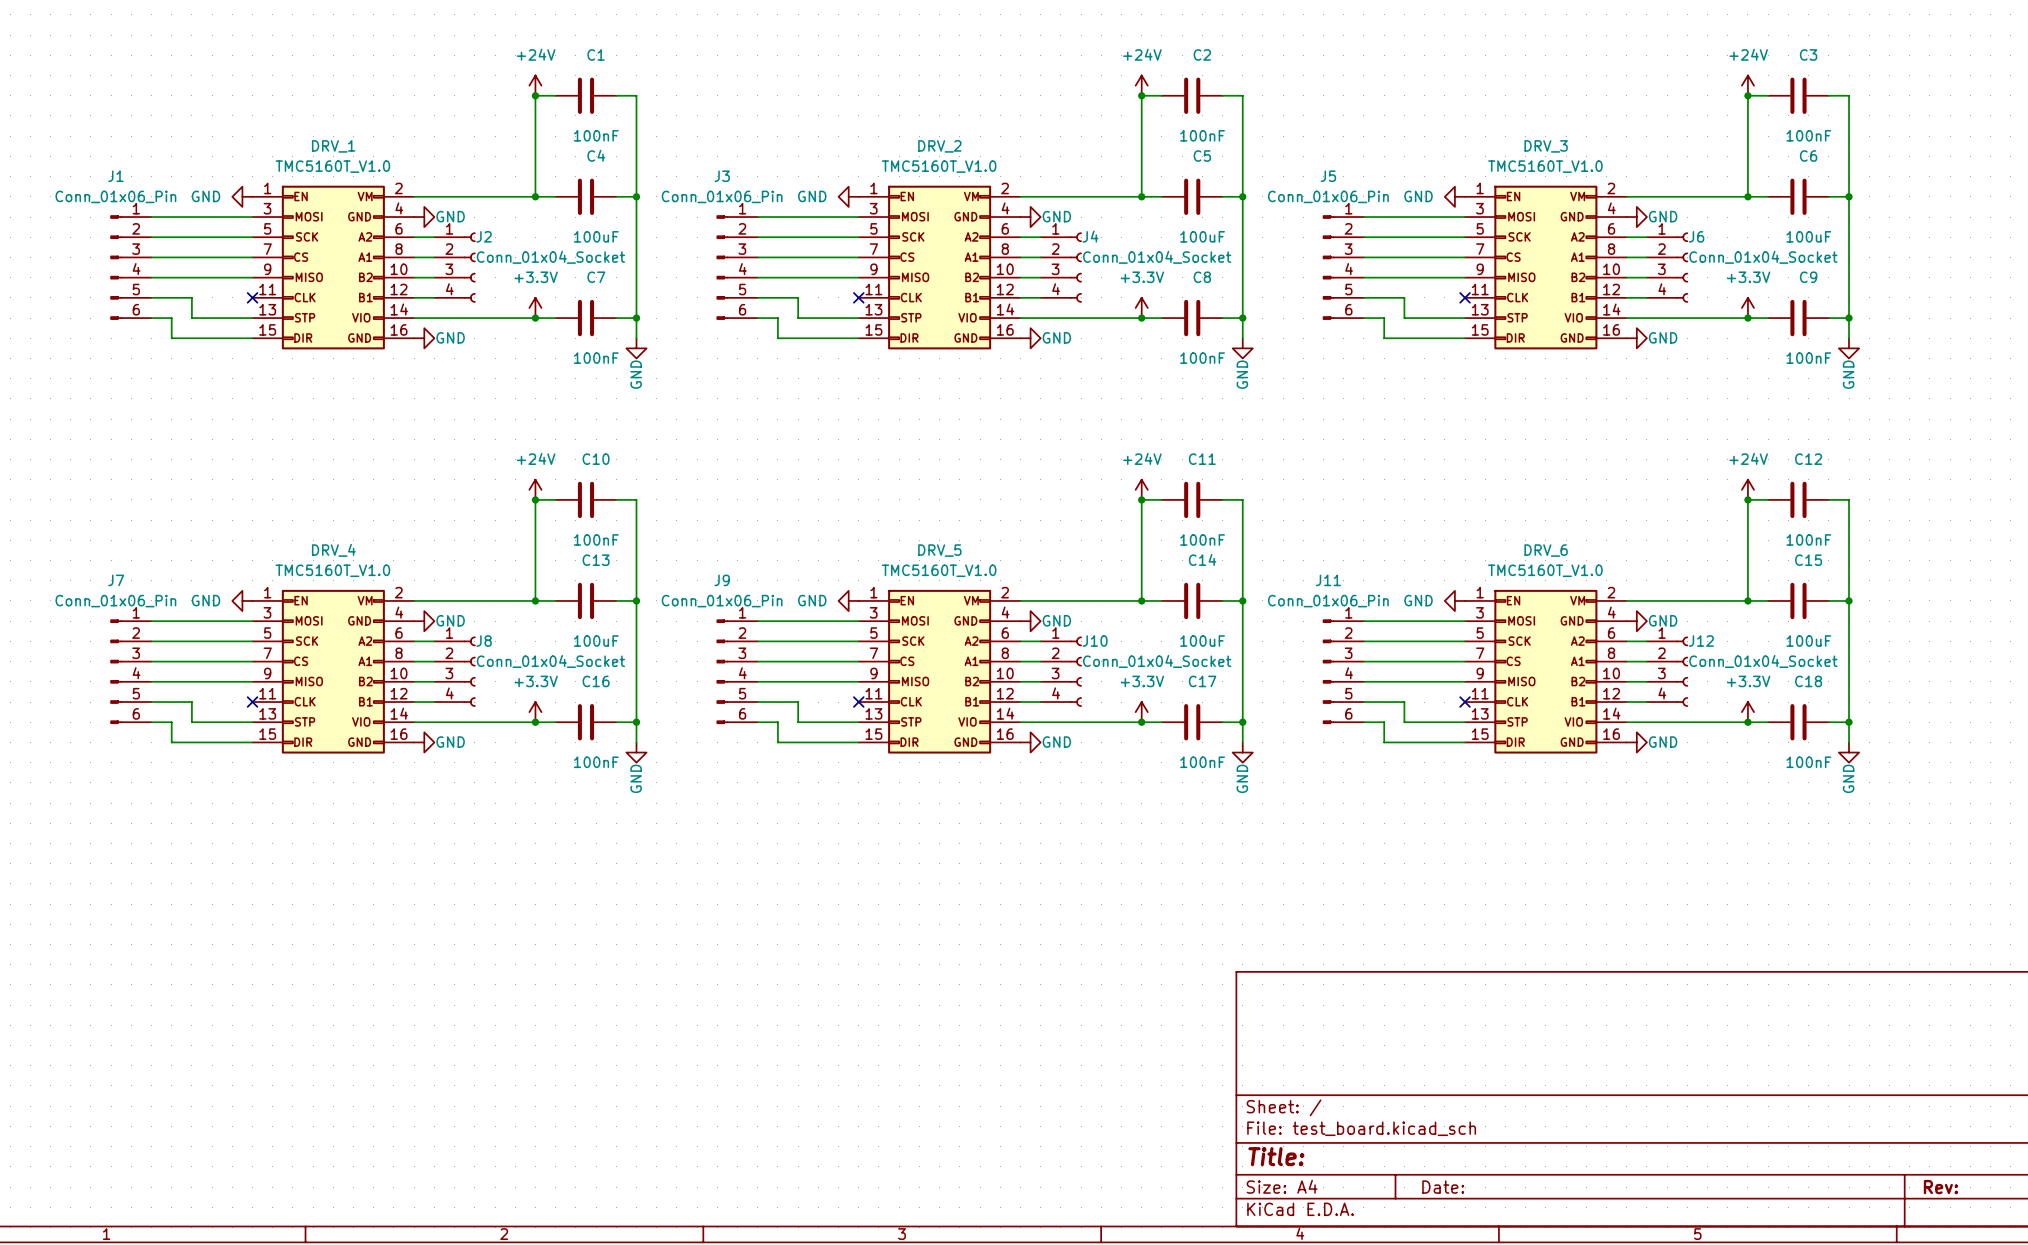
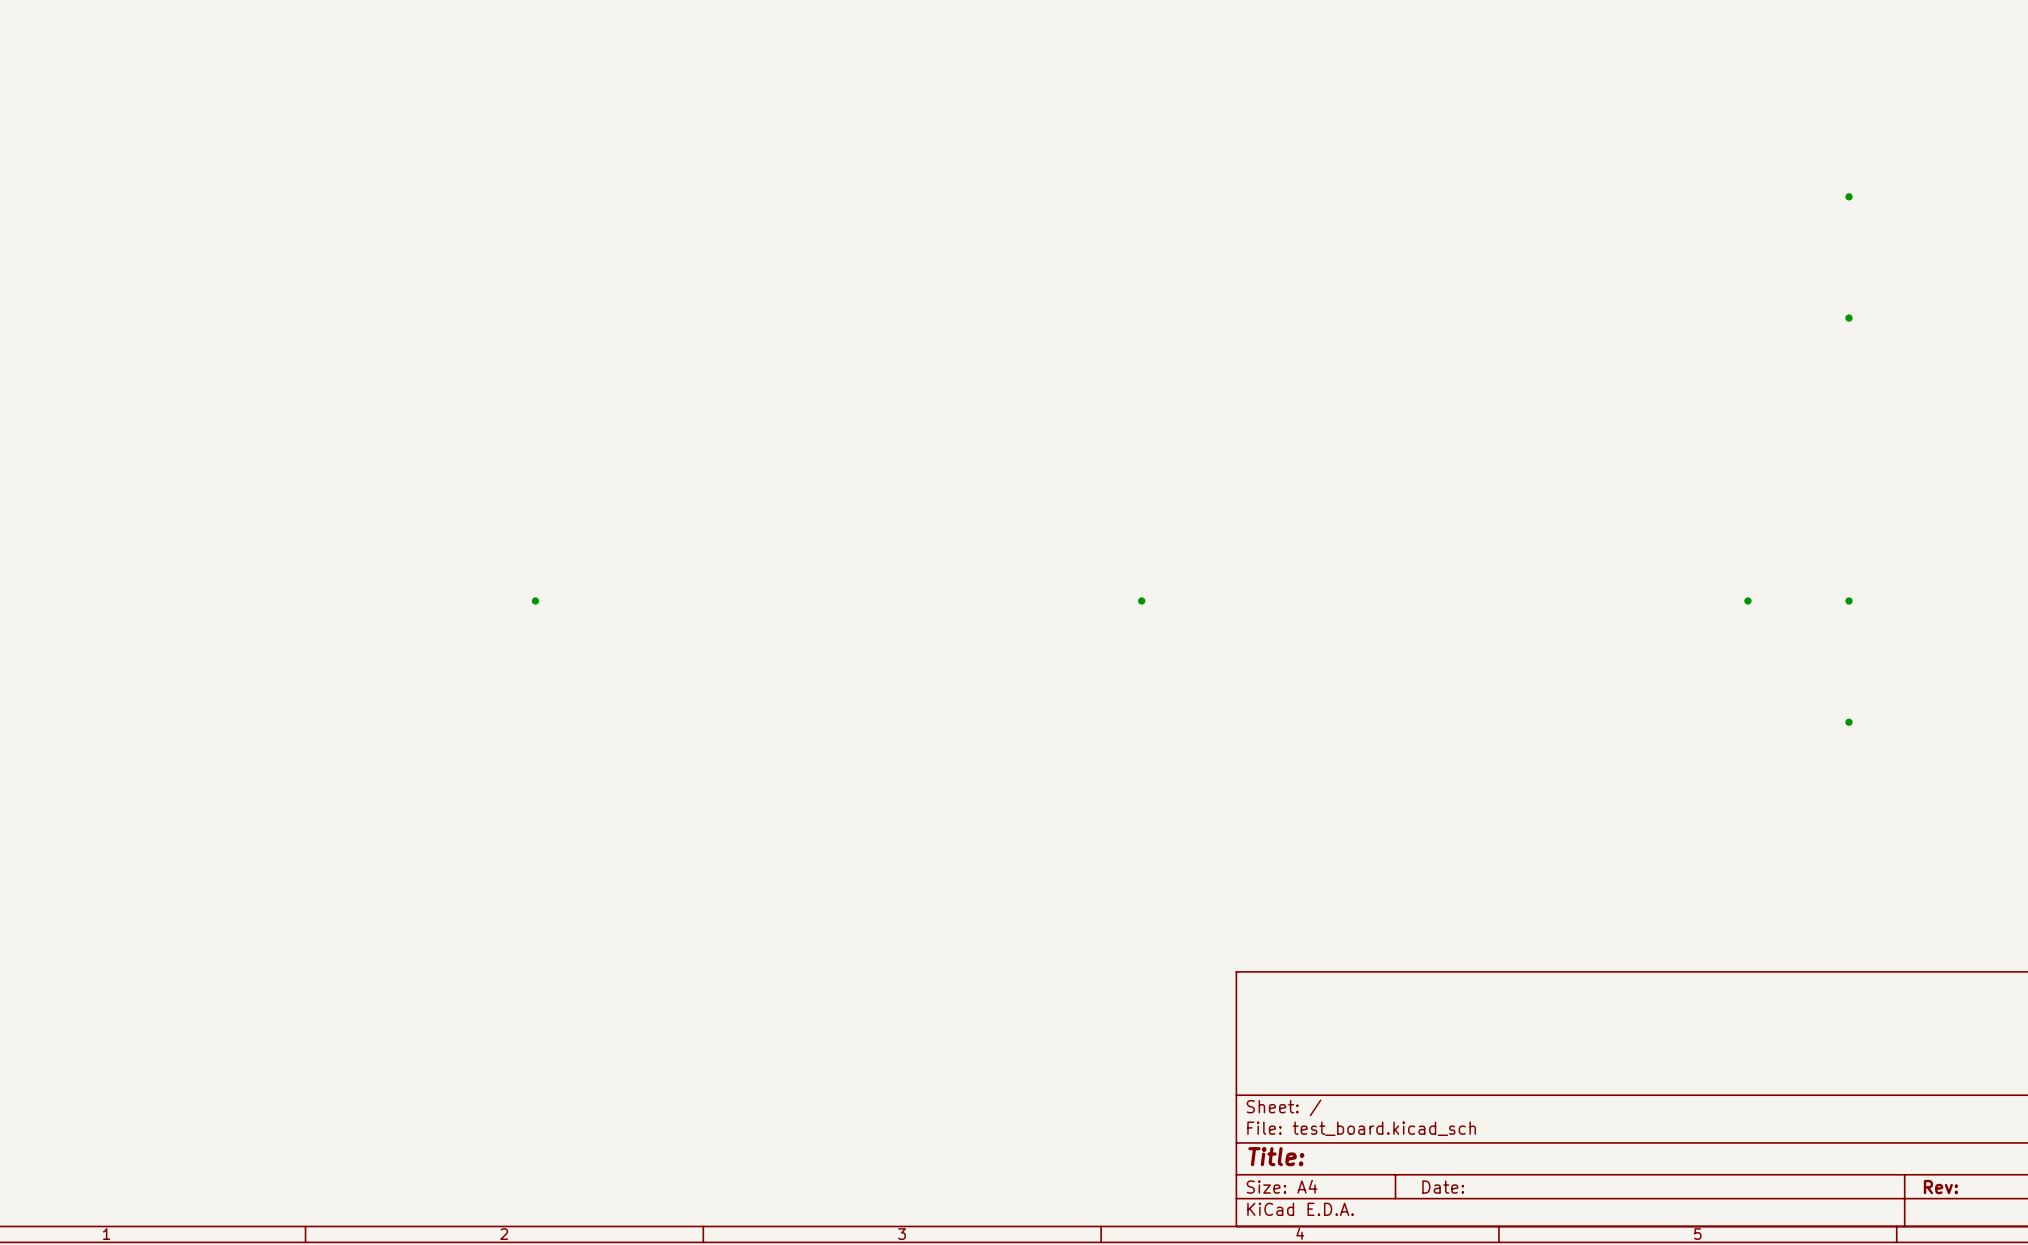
power symbol: +24V (535, 85) -> none
power symbol: +24V (1141, 85) -> none
power symbol: +24V (1747, 85) -> none
junction: (535, 95) -> none
wire: (555, 95) (535, 95) (535, 196) -> none
C1: 100nF (585, 95) -> none
wire: (616, 95) (636, 95) (636, 338) -> none
junction: (1141, 95) -> none
wire: (1161, 95) (1141, 95) (1141, 196) -> none
C2: 100nF (1192, 95) -> none
wire: (1222, 95) (1242, 95) (1242, 338) -> none
junction: (1747, 95) -> none
wire: (1768, 95) (1747, 95) (1747, 196) -> none
C3: 100nF (1798, 95) -> none
wire: (1828, 95) (1849, 95) (1849, 338) -> none
power symbol: GND (242, 196) -> none
wire: (414, 196) (555, 196) -> none
junction: (535, 196) -> none
C4: 100uF (585, 196) -> none
wire: (616, 196) (636, 196) -> none
junction: (636, 196) -> none
power symbol: GND (848, 196) -> none
wire: (1020, 196) (1161, 196) -> none
junction: (1141, 196) -> none
C5: 100uF (1192, 196) -> none
wire: (1222, 196) (1242, 196) -> none
junction: (1242, 196) -> none
power symbol: GND (1454, 196) -> none
wire: (1626, 196) (1768, 196) -> none
junction: (1747, 196) -> none
C6: 100uF (1798, 196) -> none
wire: (1828, 196) (1849, 196) -> none
wire: (151, 217) (252, 217) -> none
power symbol: GND (424, 217) -> none
wire: (757, 217) (858, 217) -> none
power symbol: GND (1030, 217) -> none
wire: (1363, 217) (1465, 217) -> none
power symbol: GND (1636, 217) -> none
wire: (151, 237) (252, 237) -> none
wire: (414, 237) (434, 237) -> none
wire: (757, 237) (858, 237) -> none
wire: (1020, 237) (1040, 237) -> none
wire: (1363, 237) (1465, 237) -> none
wire: (1626, 237) (1646, 237) -> none
wire: (151, 257) (252, 257) -> none
wire: (414, 257) (434, 257) -> none
wire: (757, 257) (858, 257) -> none
wire: (1020, 257) (1040, 257) -> none
wire: (1363, 257) (1465, 257) -> none
wire: (1626, 257) (1646, 257) -> none
J1: Conn_01x06_Pin (130, 267) -> none
DRV_1: TMC5160T_V1.0 (333, 267) -> none
J2: Conn_01x04_Socket (454, 267) -> none
J3: Conn_01x06_Pin (737, 267) -> none
DRV_2: TMC5160T_V1.0 (939, 267) -> none
J4: Conn_01x04_Socket (1061, 267) -> none
J5: Conn_01x06_Pin (1343, 267) -> none
DRV_3: TMC5160T_V1.0 (1545, 267) -> none
J6: Conn_01x04_Socket (1667, 267) -> none
wire: (151, 277) (252, 277) -> none
wire: (414, 277) (434, 277) -> none
wire: (757, 277) (858, 277) -> none
wire: (1020, 277) (1040, 277) -> none
wire: (1363, 277) (1465, 277) -> none
wire: (1626, 277) (1646, 277) -> none
wire: (151, 297) (191, 297) (191, 318) (252, 318) -> none
no-connect mark: (252, 297) -> none
wire: (414, 297) (434, 297) -> none
wire: (757, 297) (798, 297) (798, 318) (858, 318) -> none
no-connect mark: (858, 297) -> none
wire: (1020, 297) (1040, 297) -> none
wire: (1363, 297) (1404, 297) (1404, 318) (1465, 318) -> none
no-connect mark: (1465, 297) -> none
wire: (1626, 297) (1646, 297) -> none
power symbol: +3.3V (535, 307) -> none
power symbol: +3.3V (1141, 307) -> none
power symbol: +3.3V (1747, 307) -> none
wire: (151, 318) (171, 318) (171, 338) (252, 338) -> none
wire: (414, 318) (555, 318) -> none
junction: (535, 318) -> none
C7: 100nF (585, 318) -> none
wire: (616, 318) (636, 318) -> none
junction: (636, 318) -> none
wire: (757, 318) (777, 318) (777, 338) (858, 338) -> none
wire: (1020, 318) (1161, 318) -> none
junction: (1141, 318) -> none
C8: 100nF (1192, 318) -> none
wire: (1222, 318) (1242, 318) -> none
junction: (1242, 318) -> none
wire: (1363, 318) (1384, 318) (1384, 338) (1465, 338) -> none
wire: (1626, 318) (1768, 318) -> none
junction: (1747, 318) -> none
C9: 100nF (1798, 318) -> none
wire: (1828, 318) (1849, 318) -> none
power symbol: GND (424, 338) -> none
power symbol: GND (1030, 338) -> none
power symbol: GND (1636, 338) -> none
power symbol: GND (636, 348) -> none
power symbol: GND (1242, 348) -> none
power symbol: GND (1849, 348) -> none
power symbol: +24V (535, 489) -> none
power symbol: +24V (1141, 489) -> none
power symbol: +24V (1747, 489) -> none
junction: (535, 499) -> none
wire: (555, 499) (535, 499) (535, 600) -> none
C10: 100nF (585, 499) -> none
wire: (616, 499) (636, 499) (636, 742) -> none
junction: (1141, 499) -> none
wire: (1161, 499) (1141, 499) (1141, 600) -> none
C11: 100nF (1192, 499) -> none
wire: (1222, 499) (1242, 499) (1242, 742) -> none
junction: (1747, 499) -> none
wire: (1768, 499) (1747, 499) (1747, 600) -> none
C12: 100nF (1798, 499) -> none
wire: (1828, 499) (1849, 499) (1849, 742) -> none
power symbol: GND (242, 600) -> none
wire: (414, 600) (555, 600) -> none
C13: 100uF (585, 600) -> none
wire: (616, 600) (636, 600) -> none
junction: (636, 600) -> none
power symbol: GND (848, 600) -> none
wire: (1020, 600) (1161, 600) -> none
C14: 100uF (1192, 600) -> none
wire: (1222, 600) (1242, 600) -> none
junction: (1242, 600) -> none
power symbol: GND (1454, 600) -> none
wire: (1626, 600) (1768, 600) -> none
C15: 100uF (1798, 600) -> none
wire: (1828, 600) (1849, 600) -> none
wire: (151, 621) (252, 621) -> none
power symbol: GND (424, 621) -> none
wire: (757, 621) (858, 621) -> none
power symbol: GND (1030, 621) -> none
wire: (1363, 621) (1465, 621) -> none
power symbol: GND (1636, 621) -> none
wire: (151, 641) (252, 641) -> none
wire: (414, 641) (434, 641) -> none
wire: (757, 641) (858, 641) -> none
wire: (1020, 641) (1040, 641) -> none
wire: (1363, 641) (1465, 641) -> none
wire: (1626, 641) (1646, 641) -> none
wire: (151, 661) (252, 661) -> none
wire: (414, 661) (434, 661) -> none
wire: (757, 661) (858, 661) -> none
wire: (1020, 661) (1040, 661) -> none
wire: (1363, 661) (1465, 661) -> none
wire: (1626, 661) (1646, 661) -> none
J7: Conn_01x06_Pin (130, 671) -> none
DRV_4: TMC5160T_V1.0 (333, 671) -> none
J8: Conn_01x04_Socket (454, 671) -> none
J9: Conn_01x06_Pin (737, 671) -> none
DRV_5: TMC5160T_V1.0 (939, 671) -> none
J10: Conn_01x04_Socket (1061, 671) -> none
J11: Conn_01x06_Pin (1343, 671) -> none
DRV_6: TMC5160T_V1.0 (1545, 671) -> none
J12: Conn_01x04_Socket (1667, 671) -> none
wire: (151, 681) (252, 681) -> none
wire: (414, 681) (434, 681) -> none
wire: (757, 681) (858, 681) -> none
wire: (1020, 681) (1040, 681) -> none
wire: (1363, 681) (1465, 681) -> none
wire: (1626, 681) (1646, 681) -> none
wire: (151, 702) (191, 702) (191, 722) (252, 722) -> none
no-connect mark: (252, 702) -> none
wire: (414, 702) (434, 702) -> none
wire: (757, 702) (798, 702) (798, 722) (858, 722) -> none
no-connect mark: (858, 702) -> none
wire: (1020, 702) (1040, 702) -> none
wire: (1363, 702) (1404, 702) (1404, 722) (1465, 722) -> none
no-connect mark: (1465, 702) -> none
wire: (1626, 702) (1646, 702) -> none
power symbol: +3.3V (535, 712) -> none
power symbol: +3.3V (1141, 712) -> none
power symbol: +3.3V (1747, 712) -> none
wire: (151, 722) (171, 722) (171, 742) (252, 742) -> none
wire: (414, 722) (555, 722) -> none
junction: (535, 722) -> none
C16: 100nF (585, 722) -> none
wire: (616, 722) (636, 722) -> none
junction: (636, 722) -> none
wire: (757, 722) (777, 722) (777, 742) (858, 742) -> none
wire: (1020, 722) (1161, 722) -> none
junction: (1141, 722) -> none
C17: 100nF (1192, 722) -> none
wire: (1222, 722) (1242, 722) -> none
junction: (1242, 722) -> none
wire: (1363, 722) (1384, 722) (1384, 742) (1465, 742) -> none
wire: (1626, 722) (1768, 722) -> none
junction: (1747, 722) -> none
C18: 100nF (1798, 722) -> none
wire: (1828, 722) (1849, 722) -> none
power symbol: GND (424, 742) -> none
power symbol: GND (1030, 742) -> none
power symbol: GND (1636, 742) -> none
power symbol: GND (636, 752) -> none
power symbol: GND (1242, 752) -> none
power symbol: GND (1849, 752) -> none

